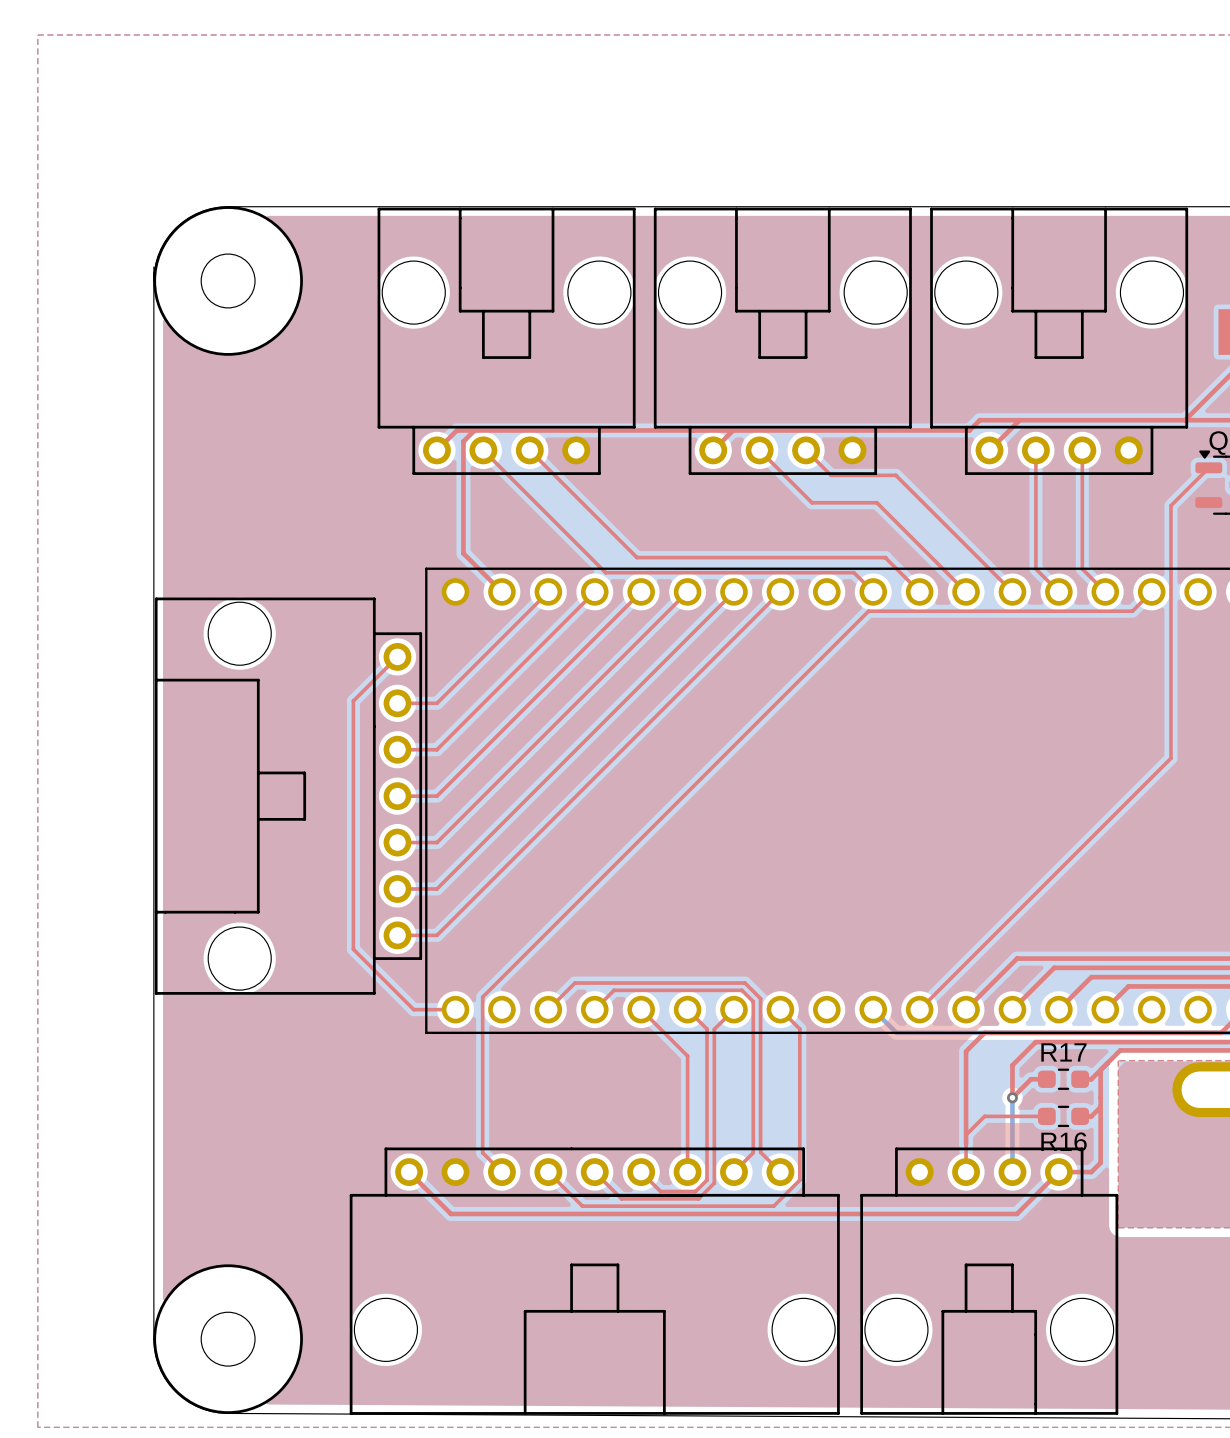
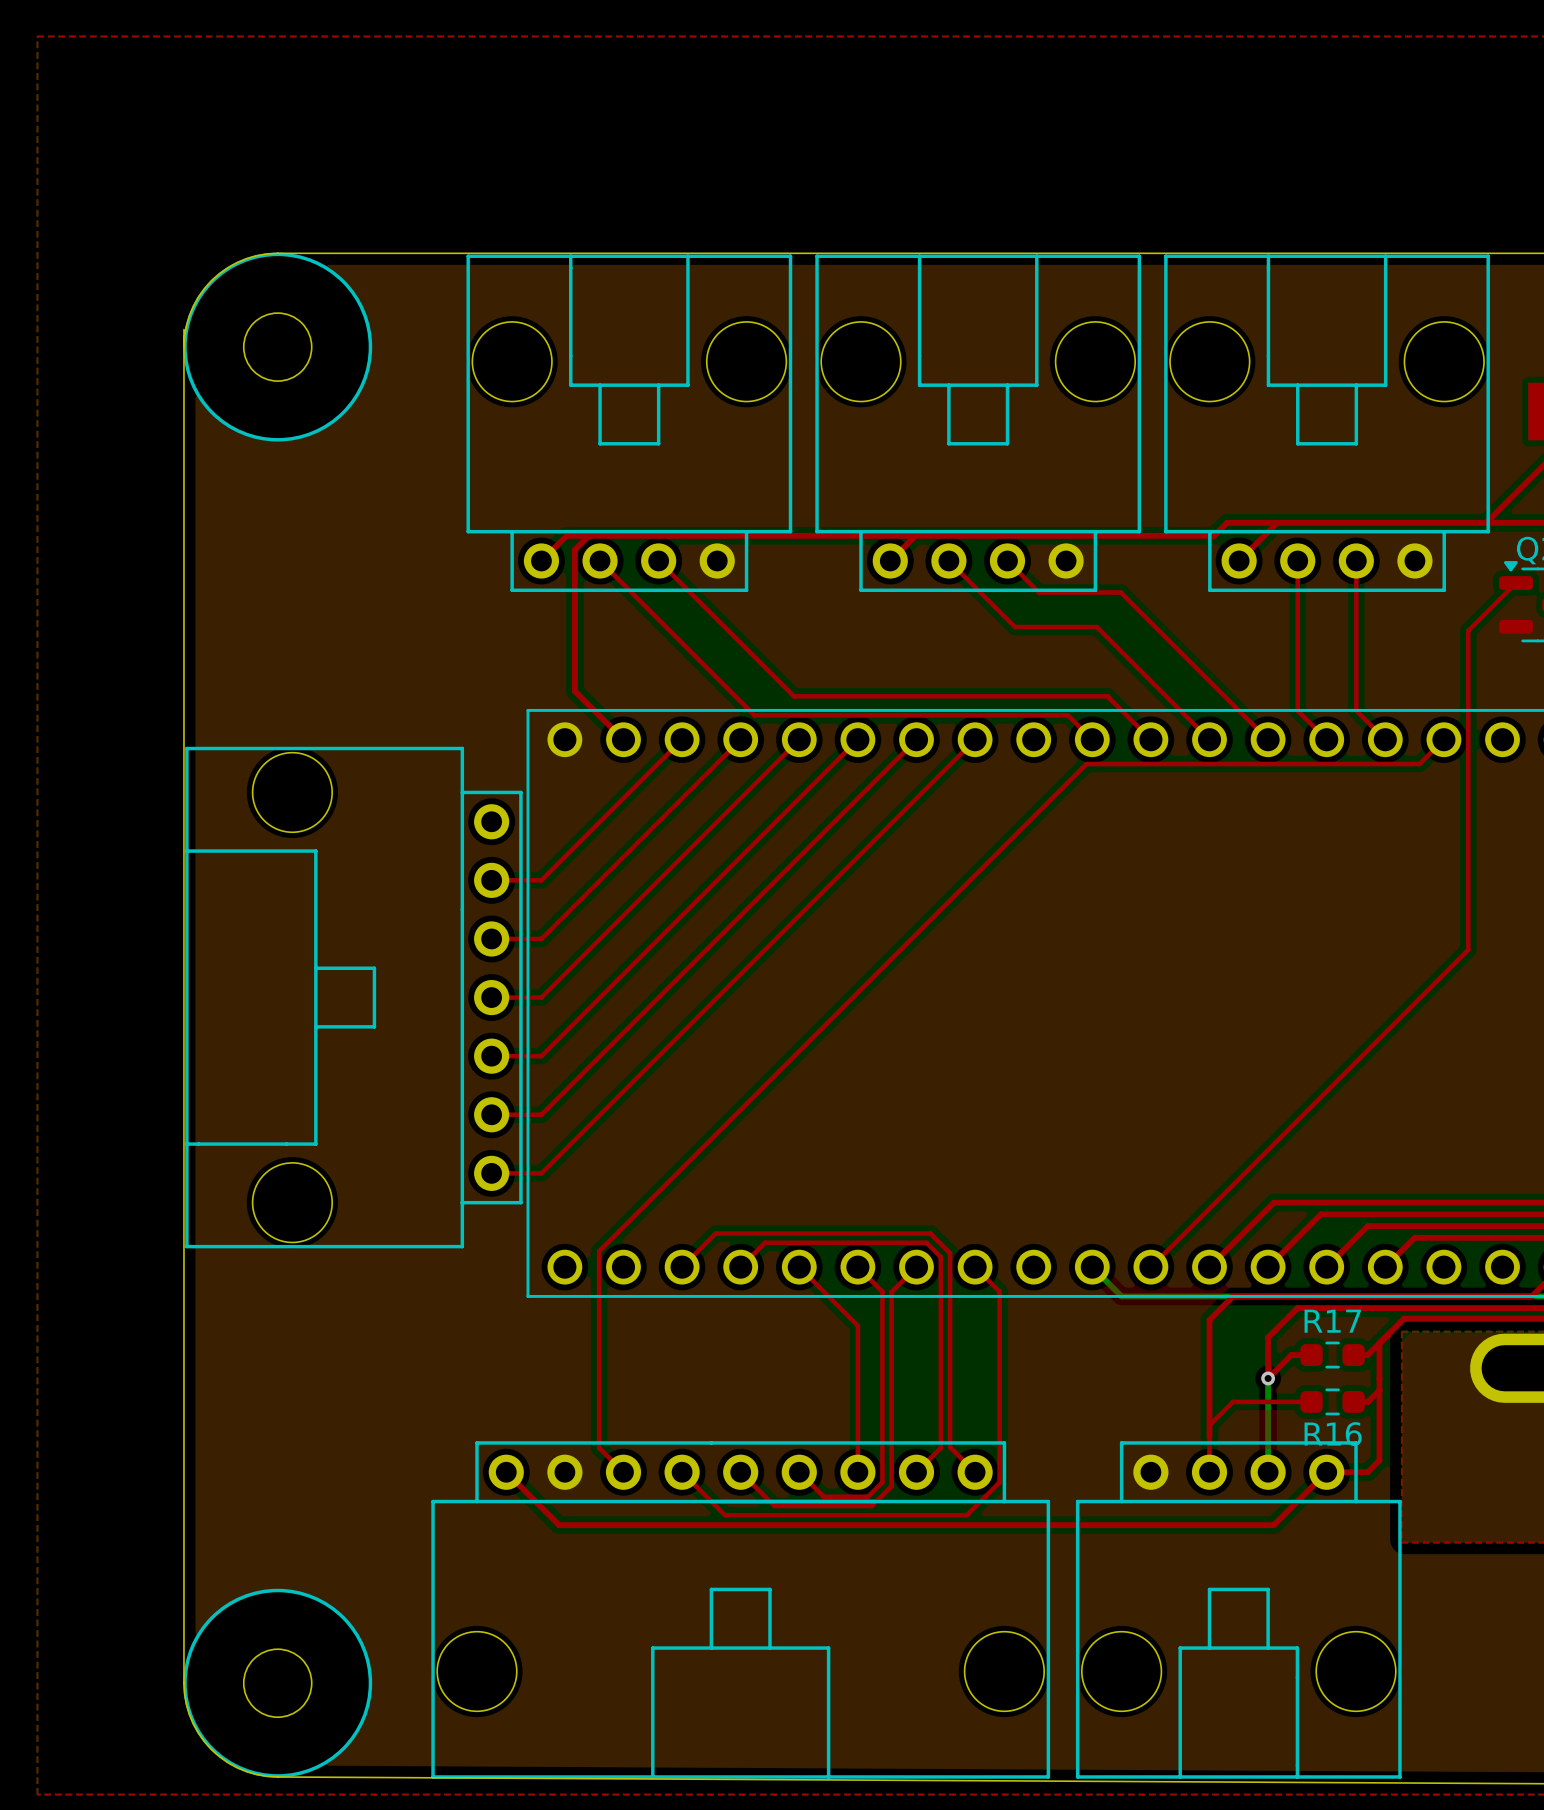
top track: (397, 656) (353, 701) (353, 949) (413, 1009) (455, 1009) -> none

